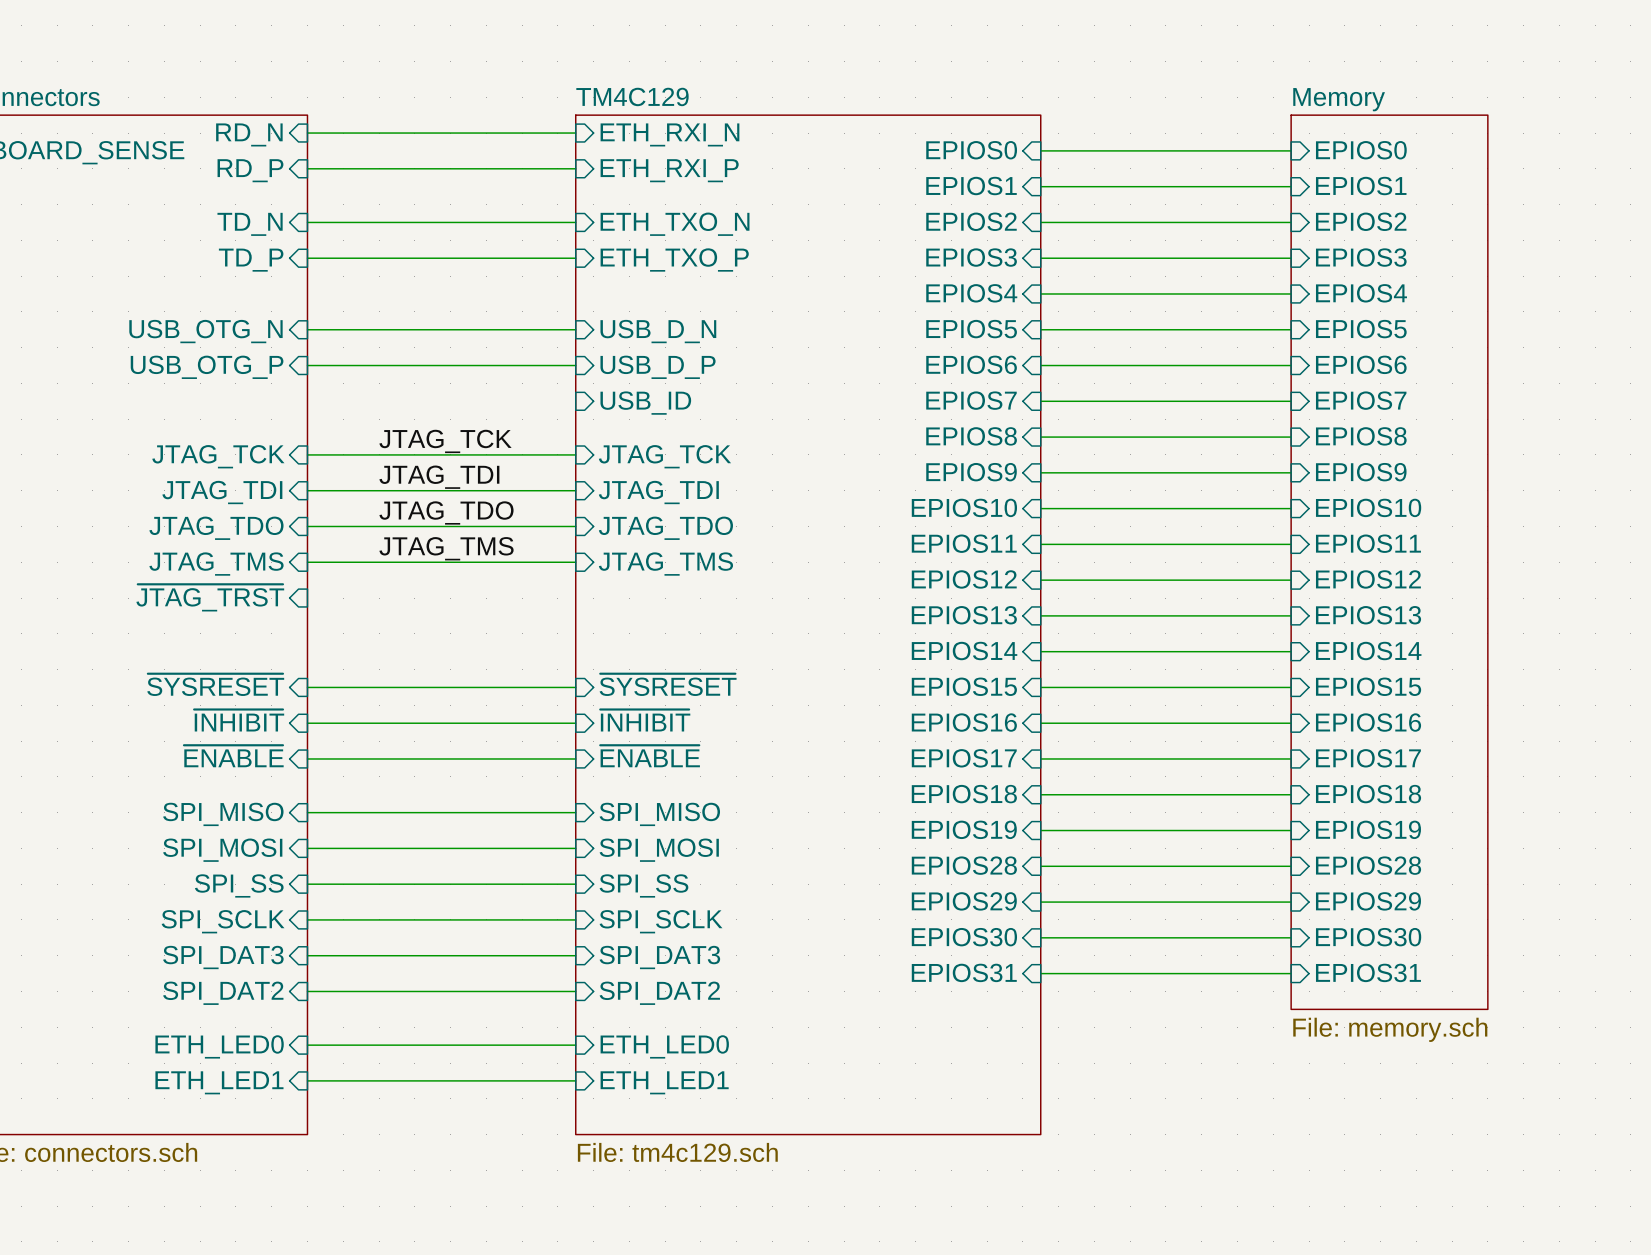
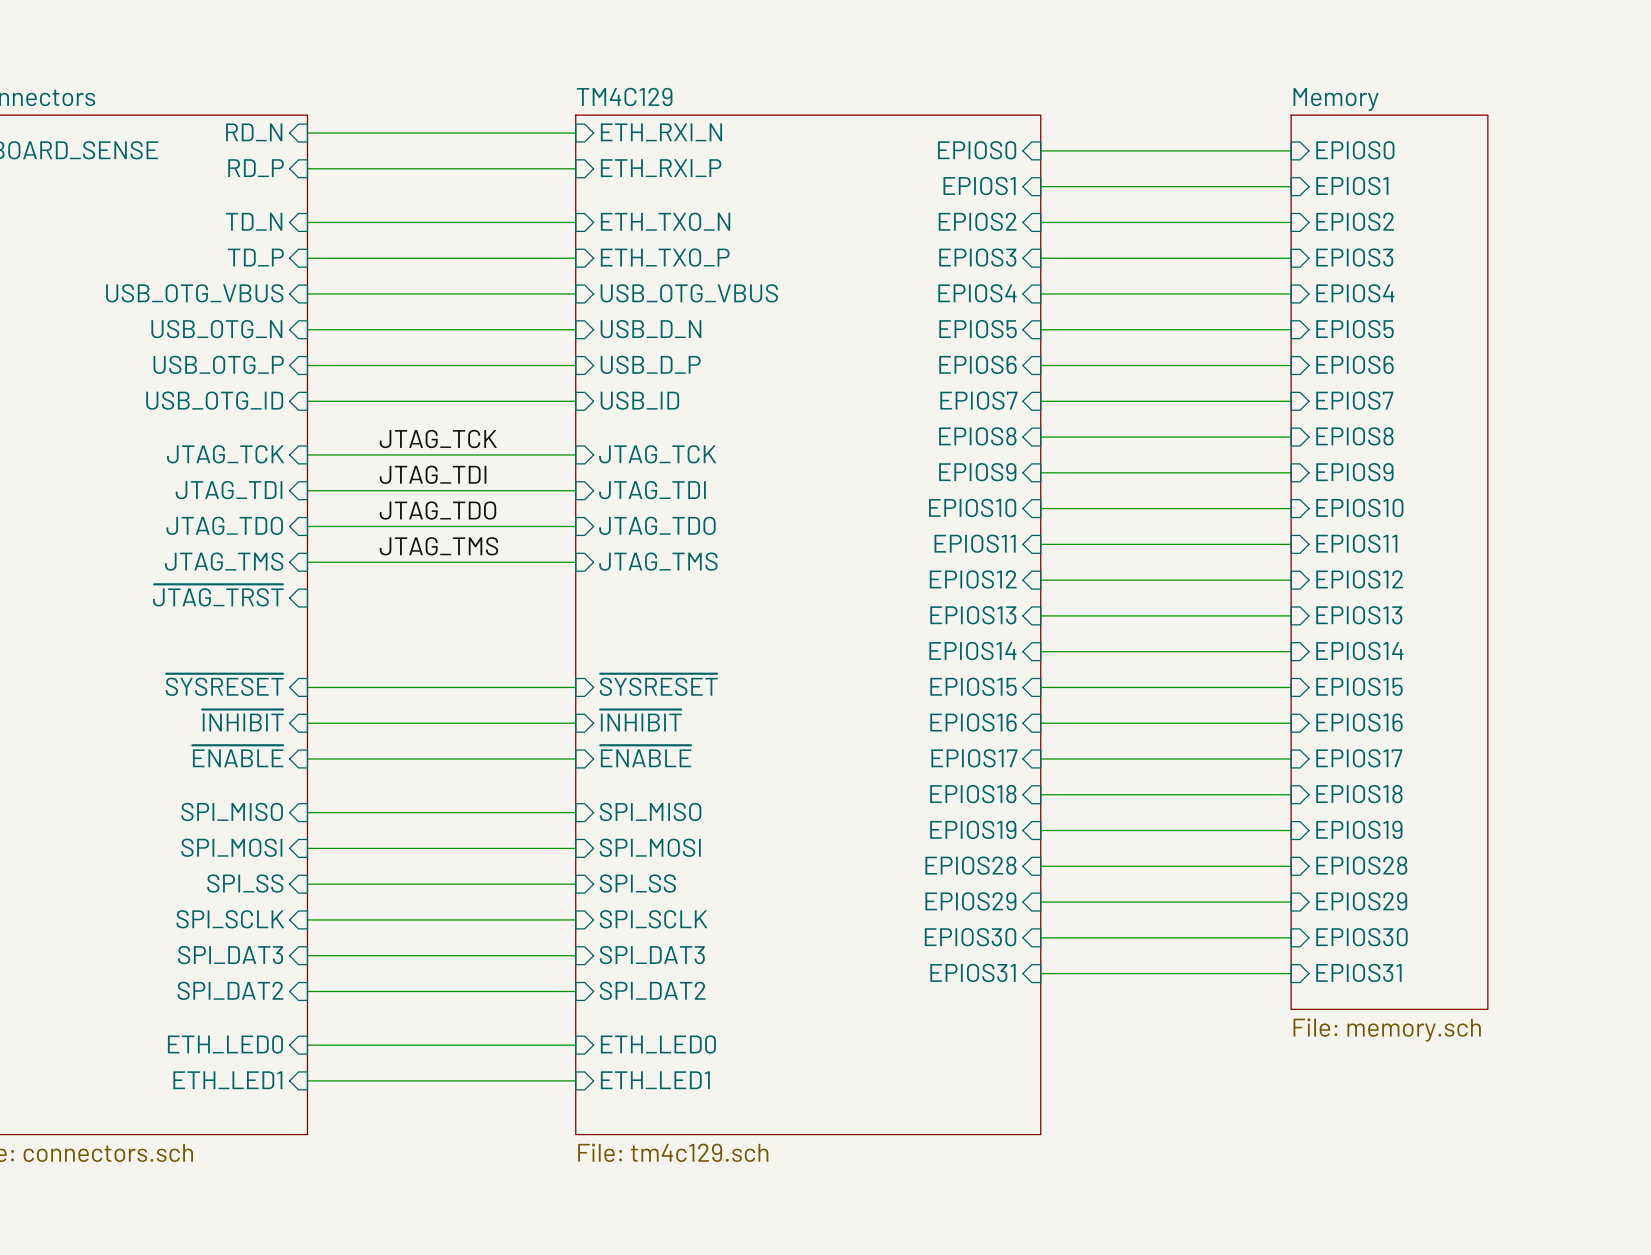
wire: none -> (307, 293) (575, 293)
sheet pin: none -> USB_OTG_VBUS (194, 293)
sheet pin: none -> USB_OTG_VBUS (689, 293)
wire: none -> (307, 401) (575, 401)
sheet pin: none -> USB_OTG_ID (214, 400)

